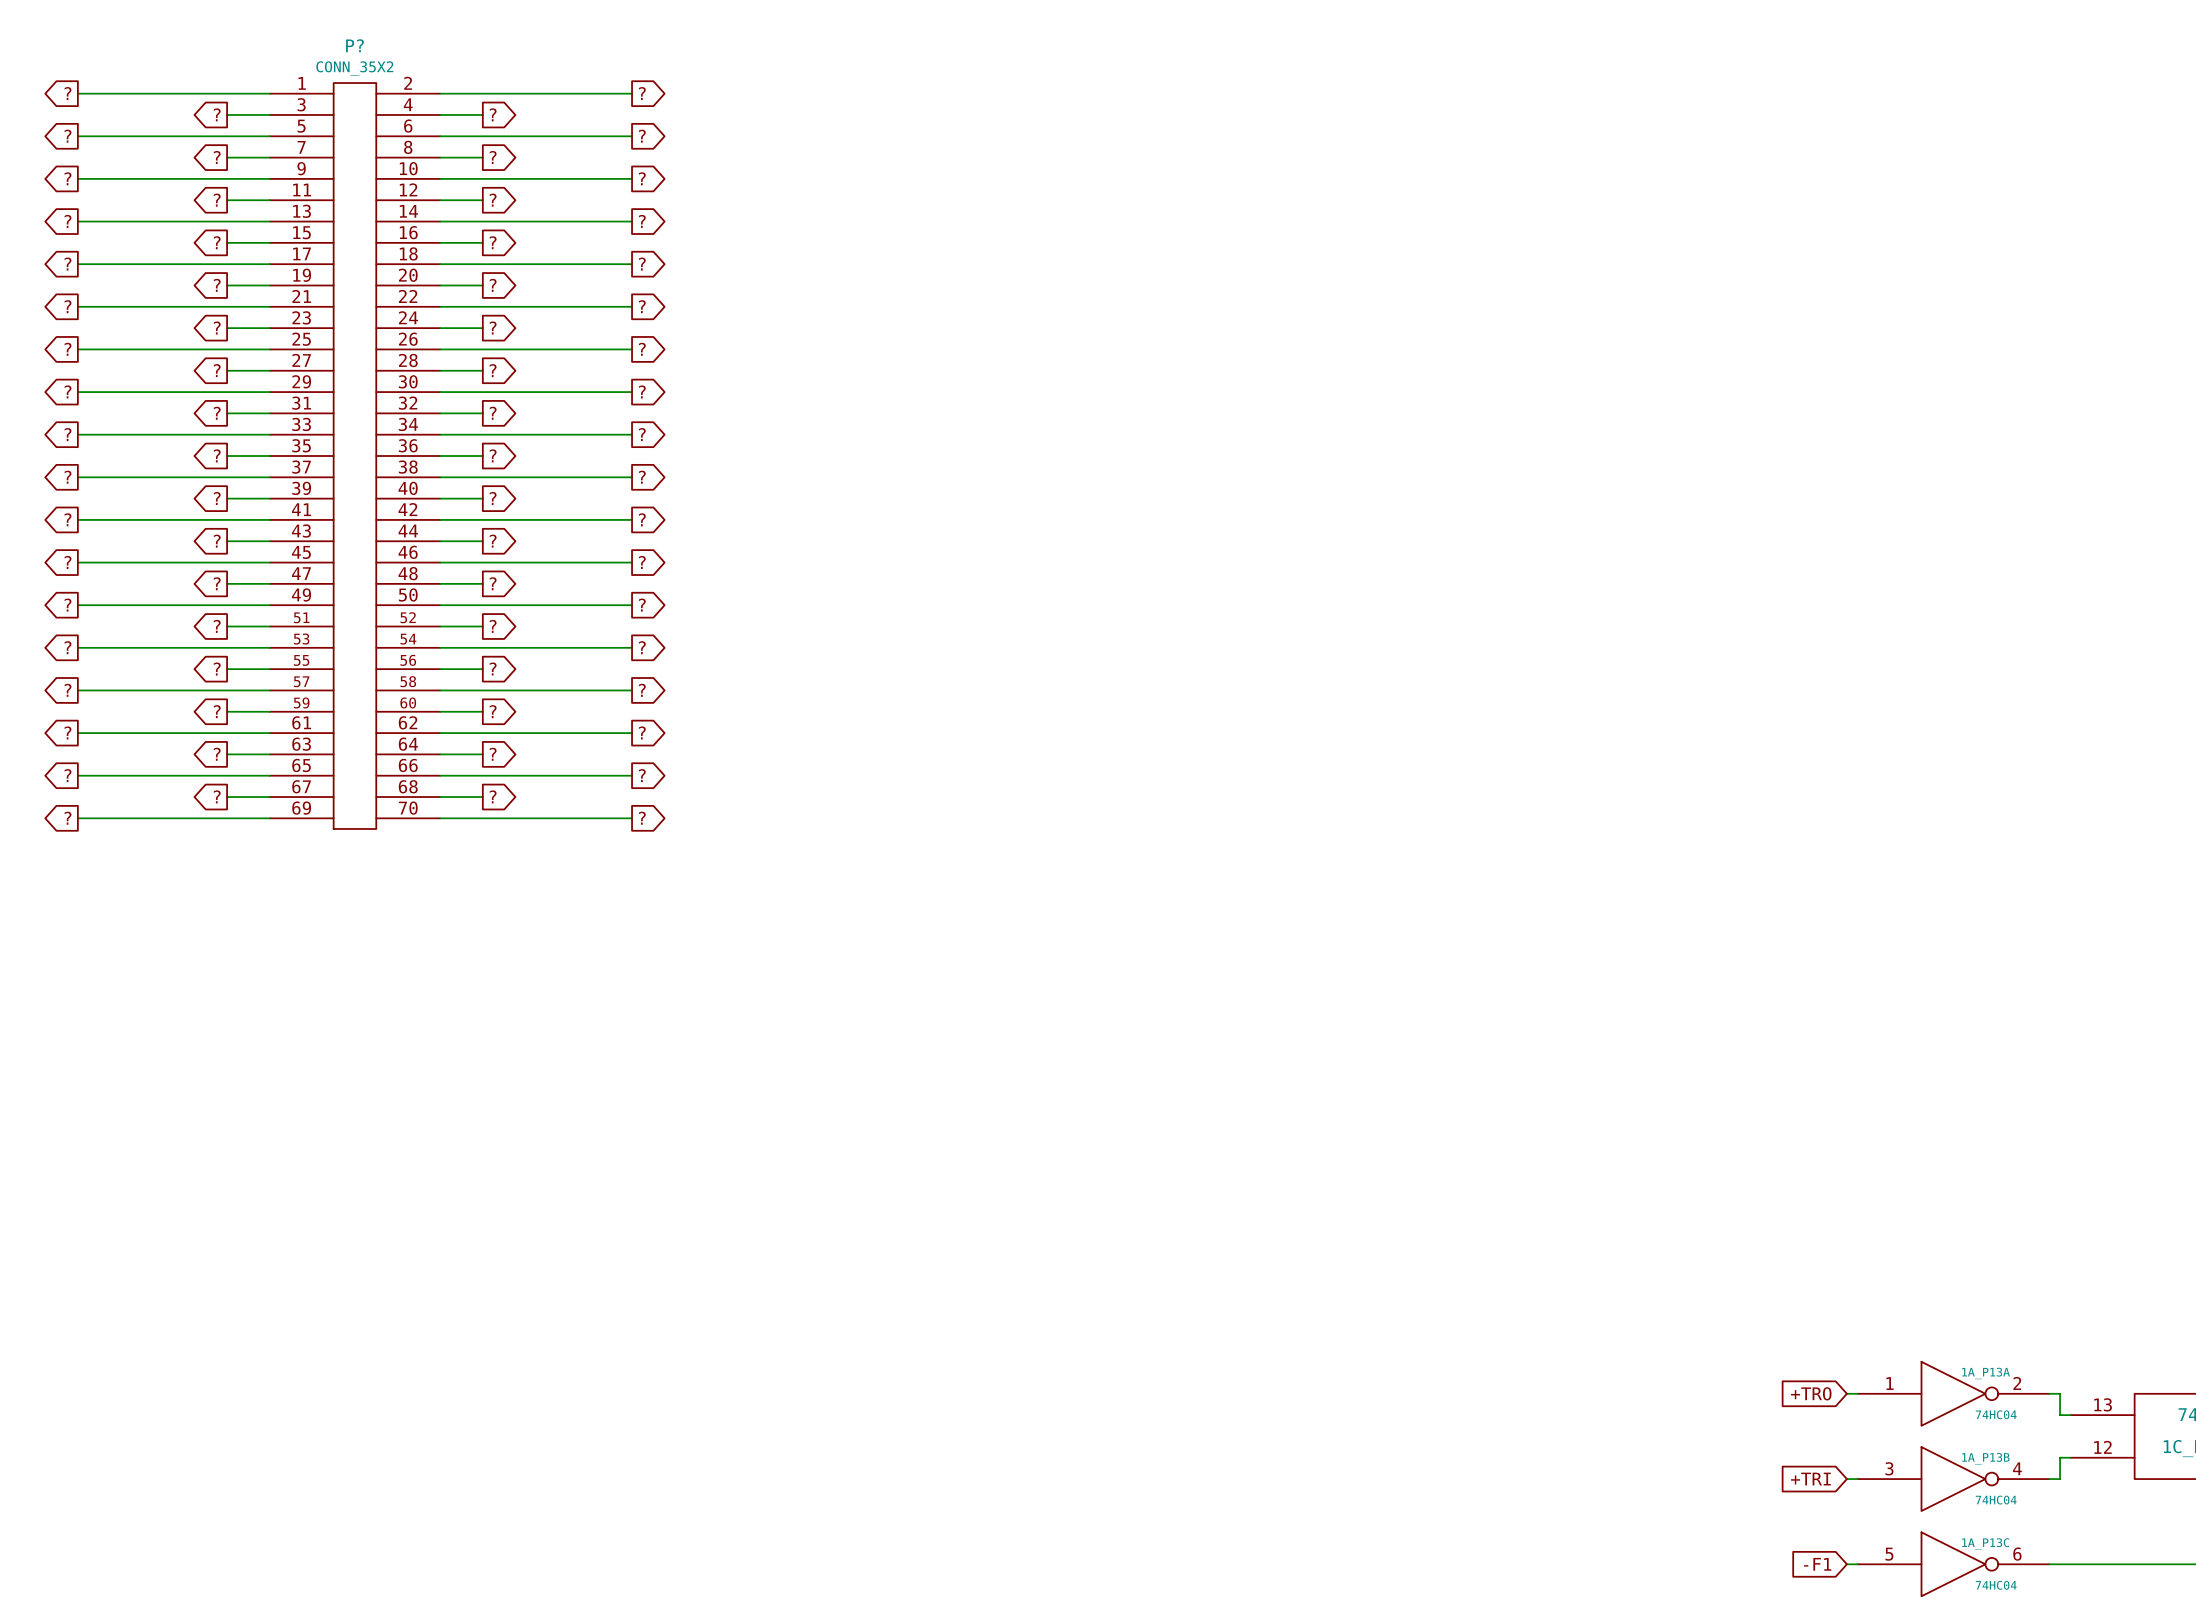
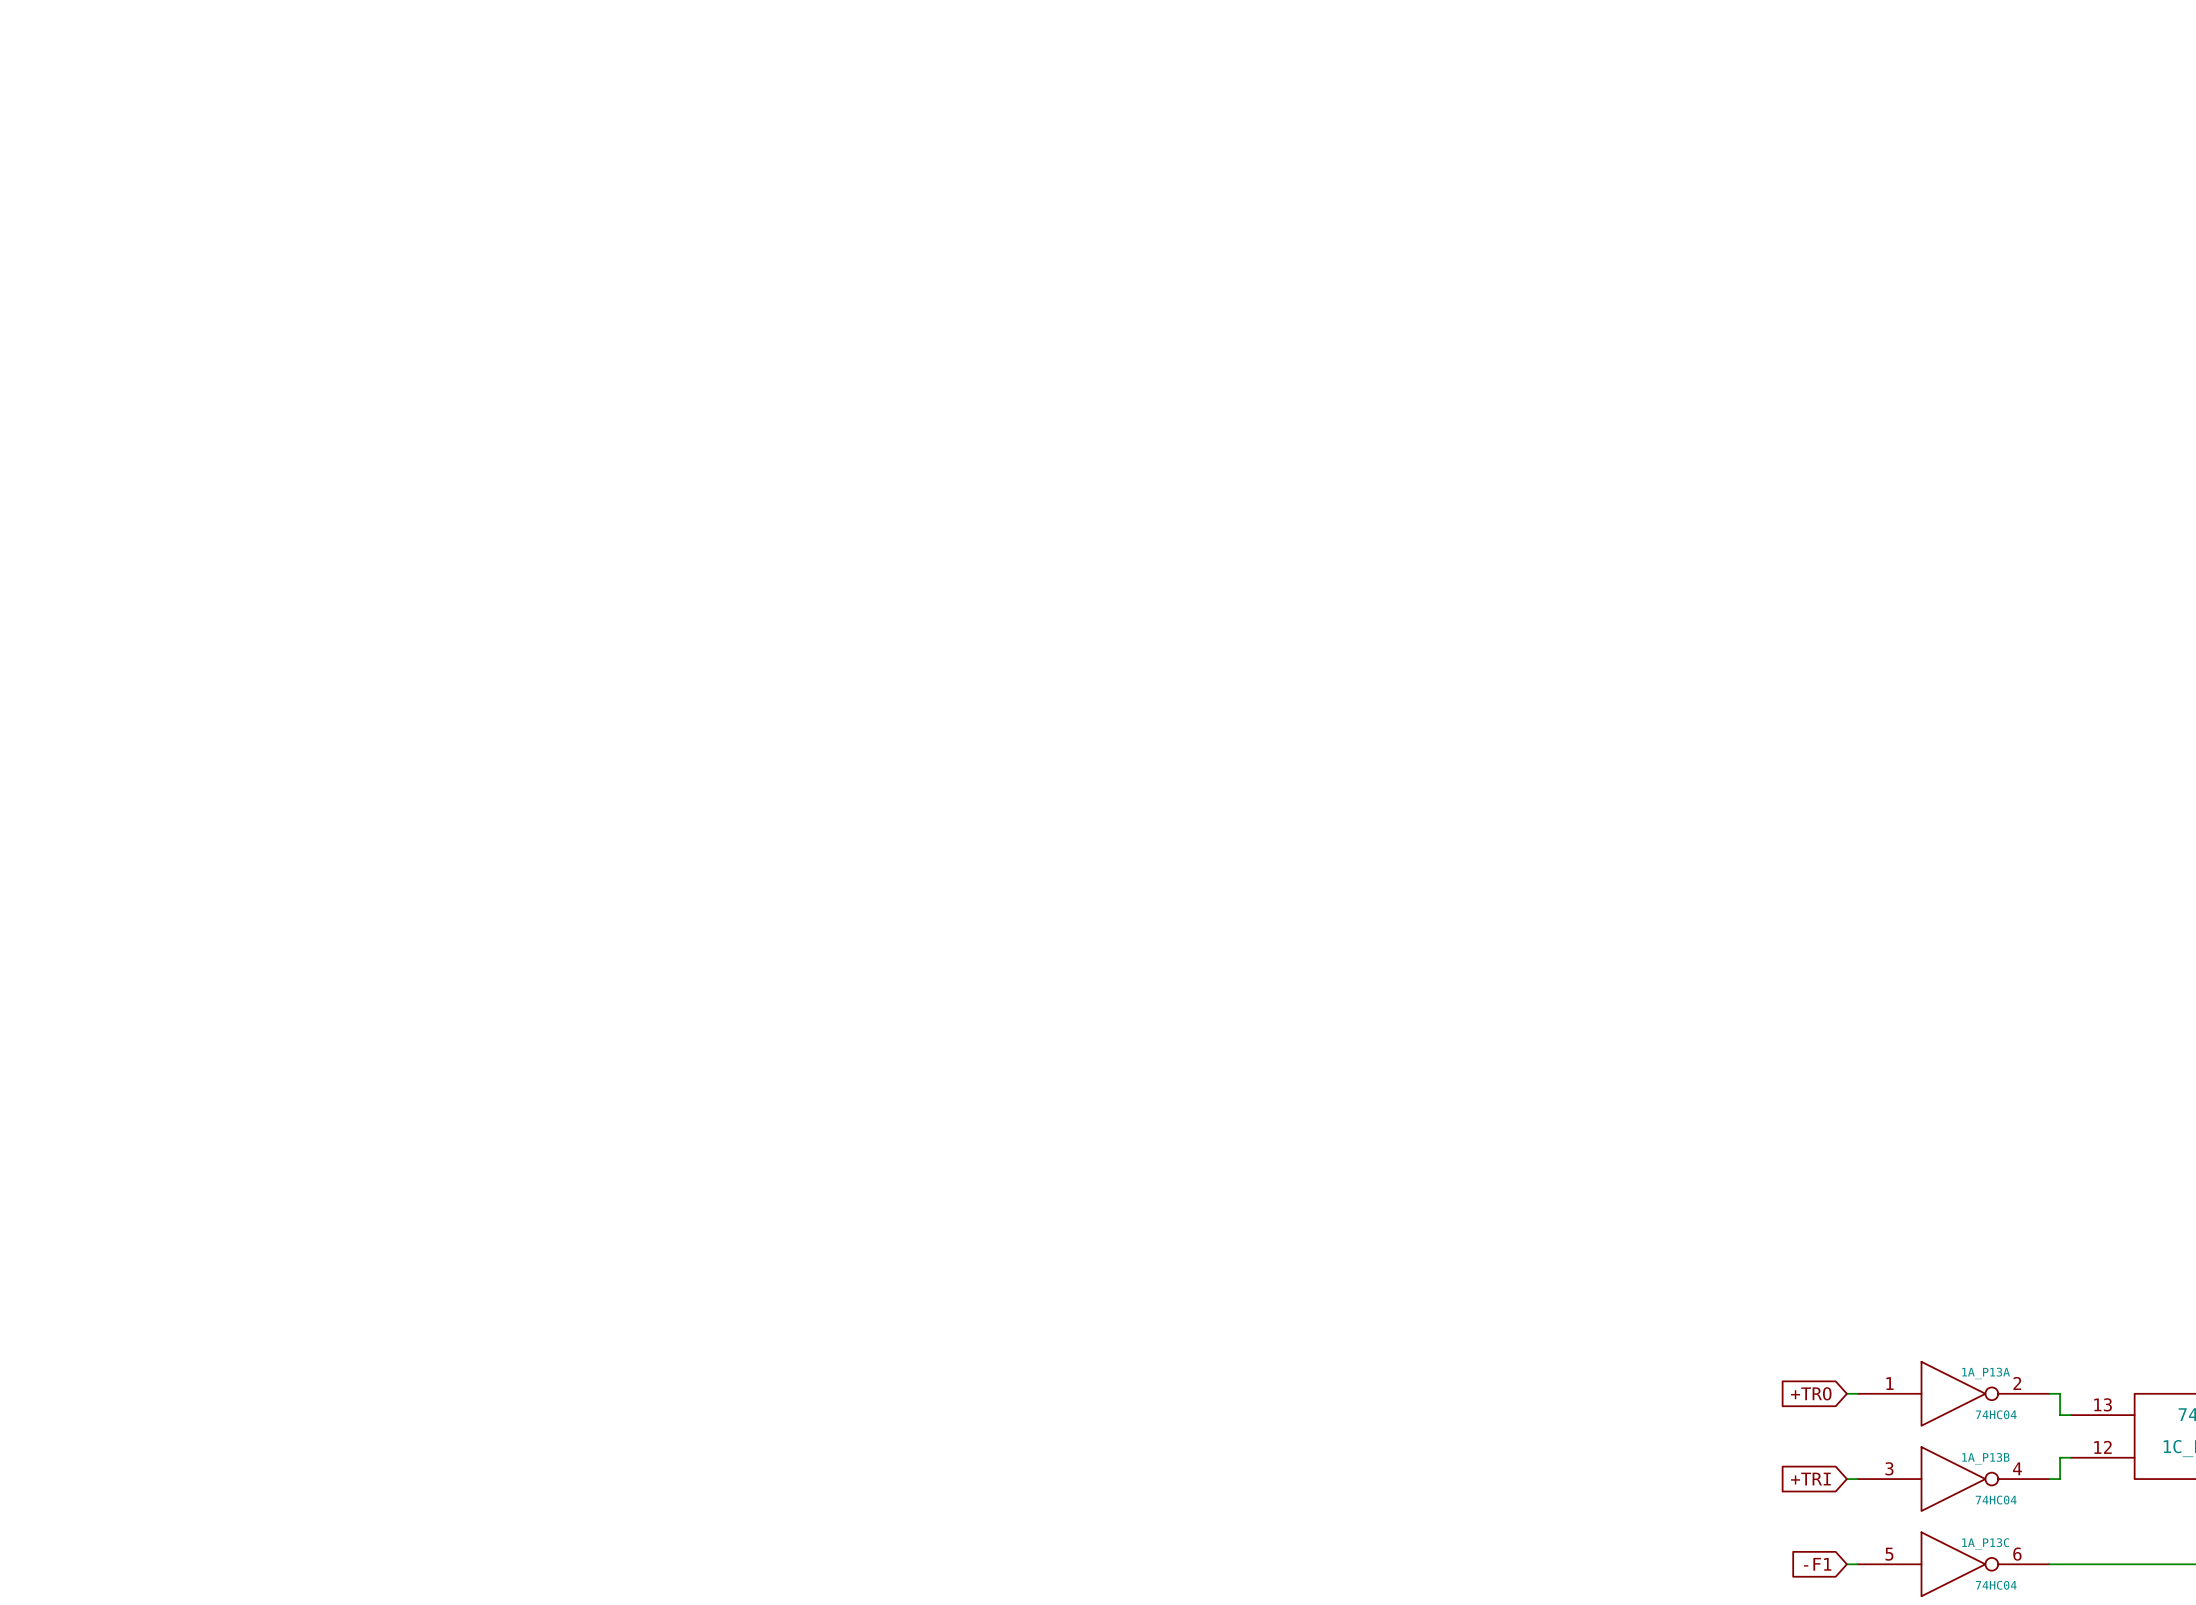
global label: ? (68, 93) -> none
wire: (77, 93) (269, 93) -> none
wire: (440, 93) (632, 93) -> none
global label: ? (642, 93) -> none
global label: ? (217, 114) -> none
wire: (227, 114) (269, 114) -> none
wire: (440, 114) (482, 114) -> none
global label: ? (493, 114) -> none
global label: ? (68, 136) -> none
wire: (77, 136) (269, 136) -> none
wire: (440, 136) (632, 136) -> none
global label: ? (642, 136) -> none
global label: ? (217, 157) -> none
wire: (227, 157) (269, 157) -> none
wire: (440, 157) (482, 157) -> none
global label: ? (493, 157) -> none
global label: ? (68, 178) -> none
wire: (77, 178) (269, 178) -> none
wire: (440, 178) (632, 178) -> none
global label: ? (642, 178) -> none
global label: ? (217, 200) -> none
wire: (227, 200) (269, 200) -> none
wire: (440, 200) (482, 200) -> none
global label: ? (493, 200) -> none
global label: ? (68, 221) -> none
wire: (77, 221) (269, 221) -> none
wire: (440, 221) (632, 221) -> none
global label: ? (642, 221) -> none
global label: ? (217, 242) -> none
wire: (227, 242) (269, 242) -> none
wire: (440, 242) (482, 242) -> none
global label: ? (493, 242) -> none
global label: ? (68, 264) -> none
wire: (77, 264) (269, 264) -> none
wire: (440, 264) (632, 264) -> none
global label: ? (642, 264) -> none
global label: ? (217, 285) -> none
wire: (227, 285) (269, 285) -> none
wire: (440, 285) (482, 285) -> none
global label: ? (493, 285) -> none
global label: ? (68, 306) -> none
wire: (77, 306) (269, 306) -> none
wire: (440, 306) (632, 306) -> none
global label: ? (642, 306) -> none
global label: ? (217, 328) -> none
wire: (227, 328) (269, 328) -> none
wire: (440, 328) (482, 328) -> none
global label: ? (493, 328) -> none
global label: ? (68, 349) -> none
wire: (77, 349) (269, 349) -> none
wire: (440, 349) (632, 349) -> none
global label: ? (642, 349) -> none
global label: ? (217, 370) -> none
wire: (227, 370) (269, 370) -> none
wire: (440, 370) (482, 370) -> none
global label: ? (493, 370) -> none
global label: ? (68, 391) -> none
global label: ? (642, 391) -> none
wire: (77, 392) (269, 392) -> none
wire: (440, 392) (632, 392) -> none
global label: ? (217, 413) -> none
wire: (227, 413) (269, 413) -> none
wire: (440, 413) (482, 413) -> none
global label: ? (493, 413) -> none
global label: ? (68, 434) -> none
wire: (77, 434) (269, 434) -> none
wire: (440, 434) (632, 434) -> none
global label: ? (642, 434) -> none
global label: ? (217, 455) -> none
global label: ? (493, 455) -> none
wire: (227, 456) (269, 456) -> none
P?: CONN_35X2 (354, 456) -> none
wire: (440, 456) (482, 456) -> none
global label: ? (68, 477) -> none
wire: (77, 477) (269, 477) -> none
wire: (440, 477) (632, 477) -> none
global label: ? (642, 477) -> none
global label: ? (217, 498) -> none
wire: (227, 498) (269, 498) -> none
wire: (440, 498) (482, 498) -> none
global label: ? (493, 498) -> none
global label: ? (68, 519) -> none
wire: (77, 519) (269, 519) -> none
wire: (440, 519) (632, 519) -> none
global label: ? (642, 519) -> none
global label: ? (217, 541) -> none
wire: (227, 541) (269, 541) -> none
wire: (440, 541) (482, 541) -> none
global label: ? (493, 541) -> none
global label: ? (68, 562) -> none
wire: (77, 562) (269, 562) -> none
wire: (440, 562) (632, 562) -> none
global label: ? (642, 562) -> none
global label: ? (217, 583) -> none
wire: (227, 583) (269, 583) -> none
wire: (440, 583) (482, 583) -> none
global label: ? (493, 583) -> none
global label: ? (68, 605) -> none
wire: (77, 605) (269, 605) -> none
wire: (440, 605) (632, 605) -> none
global label: ? (642, 605) -> none
global label: ? (217, 626) -> none
wire: (227, 626) (269, 626) -> none
wire: (440, 626) (482, 626) -> none
global label: ? (493, 626) -> none
global label: ? (68, 647) -> none
wire: (77, 647) (269, 647) -> none
wire: (440, 647) (632, 647) -> none
global label: ? (642, 647) -> none
global label: ? (217, 669) -> none
wire: (227, 669) (269, 669) -> none
wire: (440, 669) (482, 669) -> none
global label: ? (493, 669) -> none
global label: ? (68, 690) -> none
wire: (77, 690) (269, 690) -> none
wire: (440, 690) (632, 690) -> none
global label: ? (642, 690) -> none
global label: ? (217, 711) -> none
wire: (227, 711) (269, 711) -> none
wire: (440, 711) (482, 711) -> none
global label: ? (493, 711) -> none
global label: ? (68, 732) -> none
global label: ? (642, 732) -> none
wire: (77, 733) (269, 733) -> none
wire: (440, 733) (632, 733) -> none
global label: ? (217, 754) -> none
wire: (227, 754) (269, 754) -> none
wire: (440, 754) (482, 754) -> none
global label: ? (493, 754) -> none
global label: ? (68, 775) -> none
wire: (77, 775) (269, 775) -> none
wire: (440, 775) (632, 775) -> none
global label: ? (642, 775) -> none
global label: ? (217, 796) -> none
global label: ? (493, 796) -> none
wire: (227, 797) (269, 797) -> none
wire: (440, 797) (482, 797) -> none
global label: ? (68, 818) -> none
wire: (77, 818) (269, 818) -> none
wire: (440, 818) (632, 818) -> none
global label: ? (642, 818) -> none

